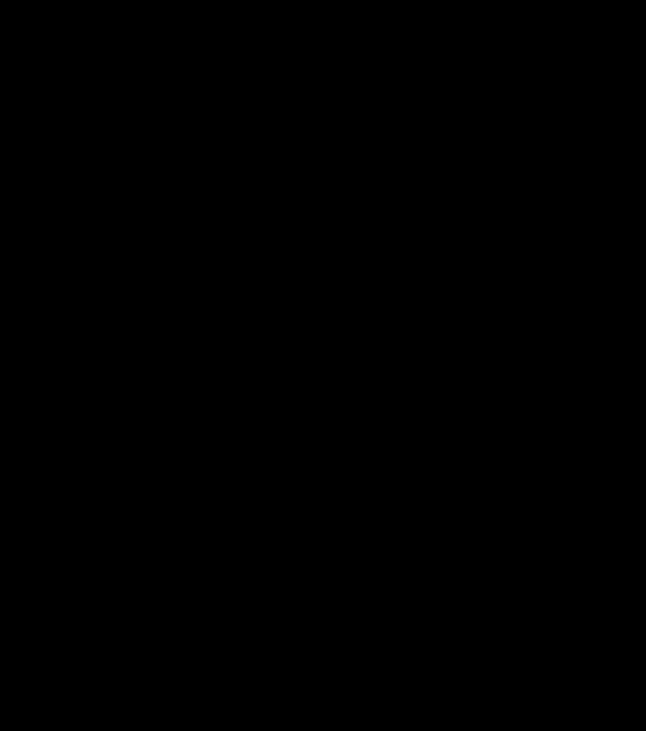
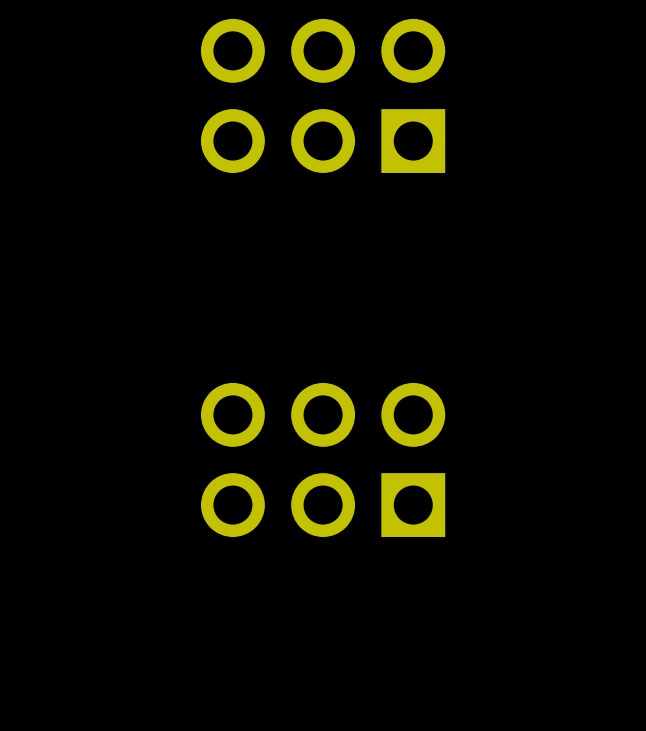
part: none -> (323, 95)
part: none -> (323, 459)

